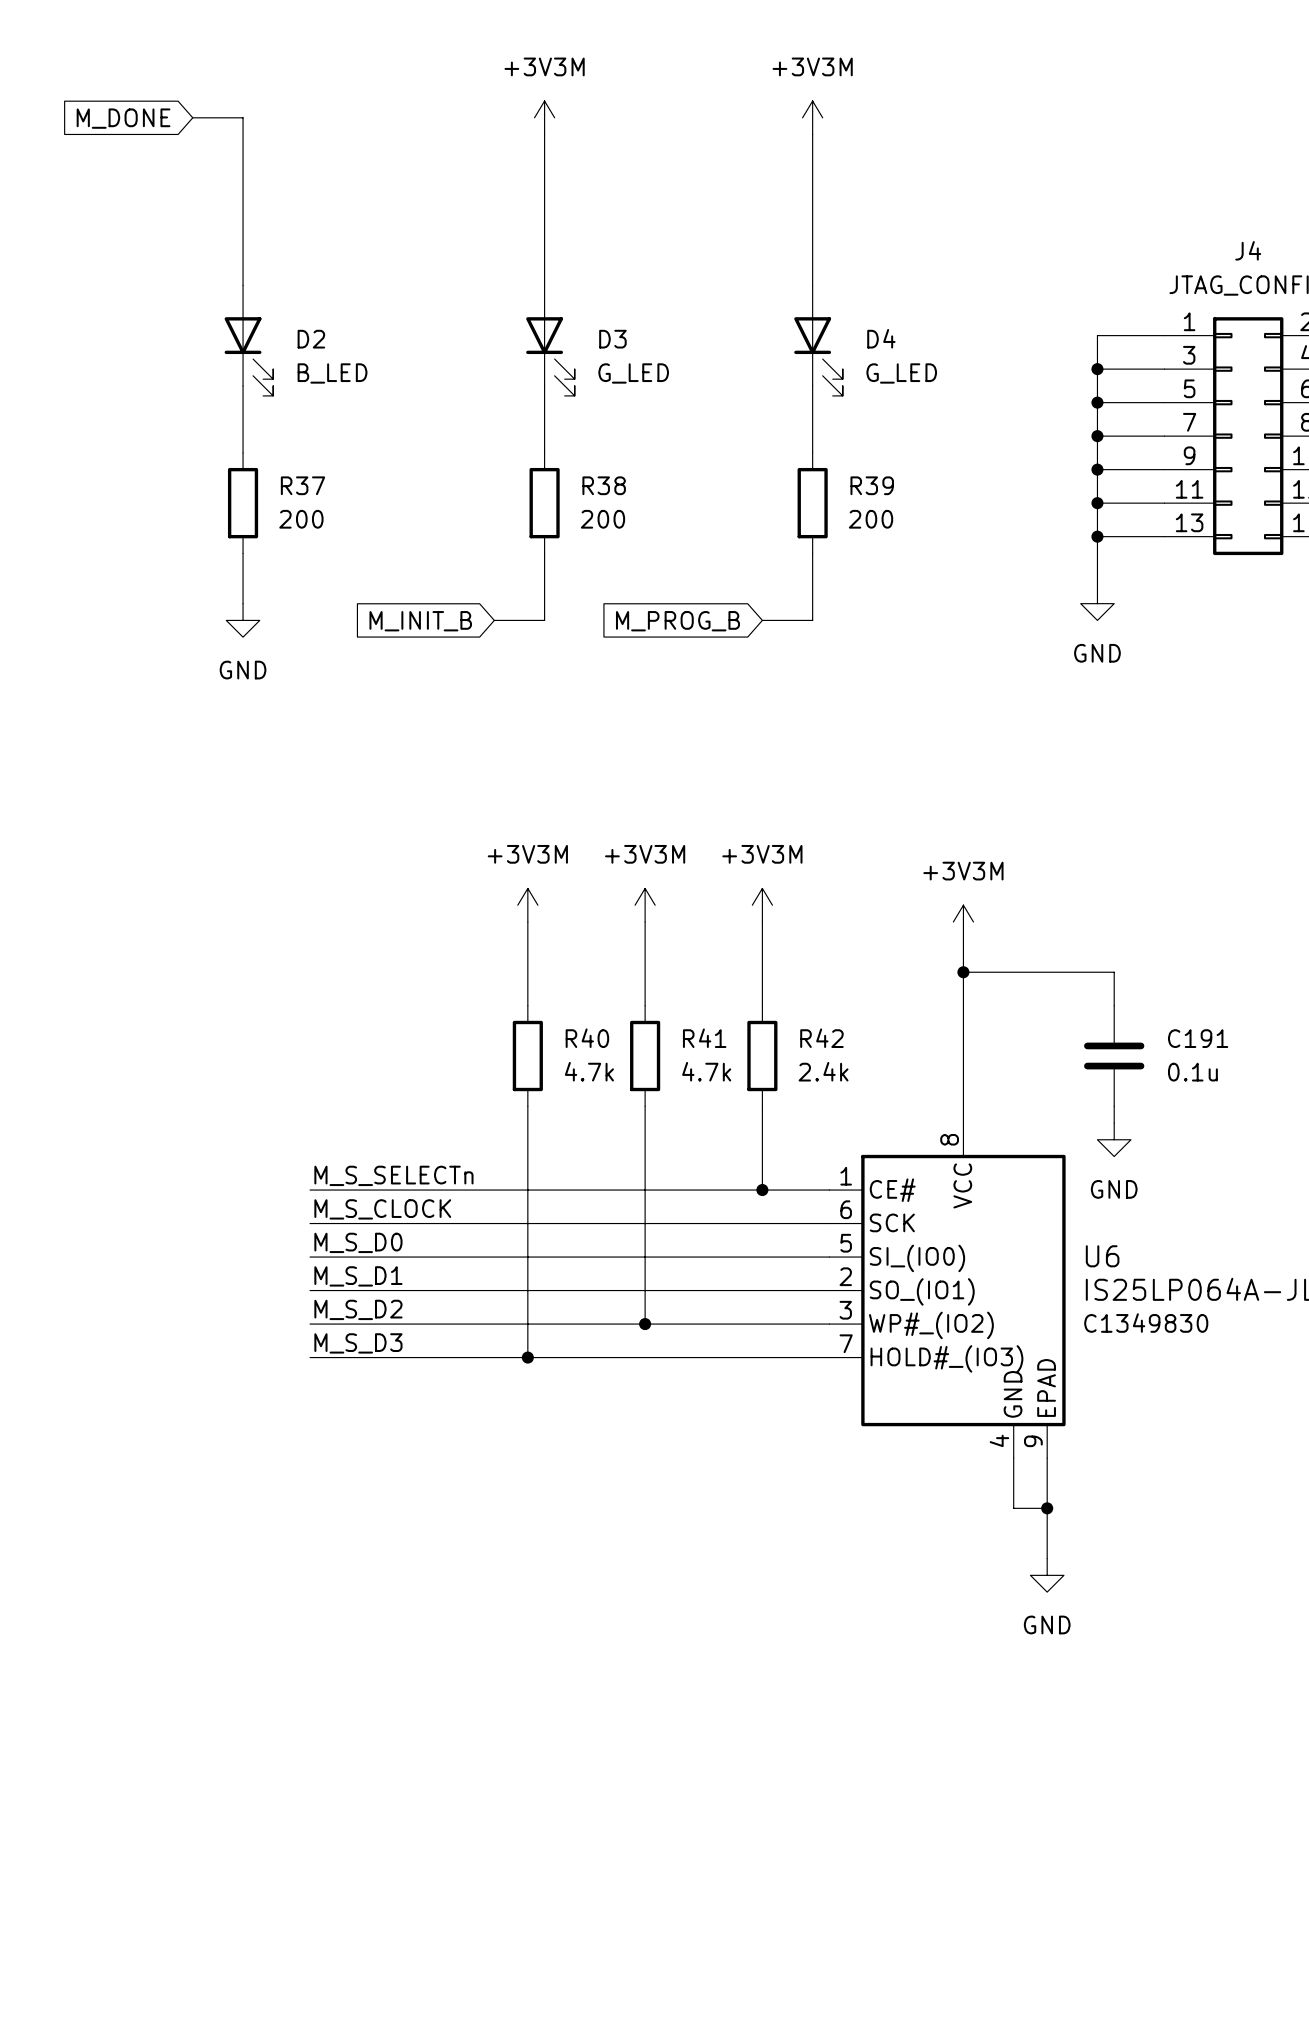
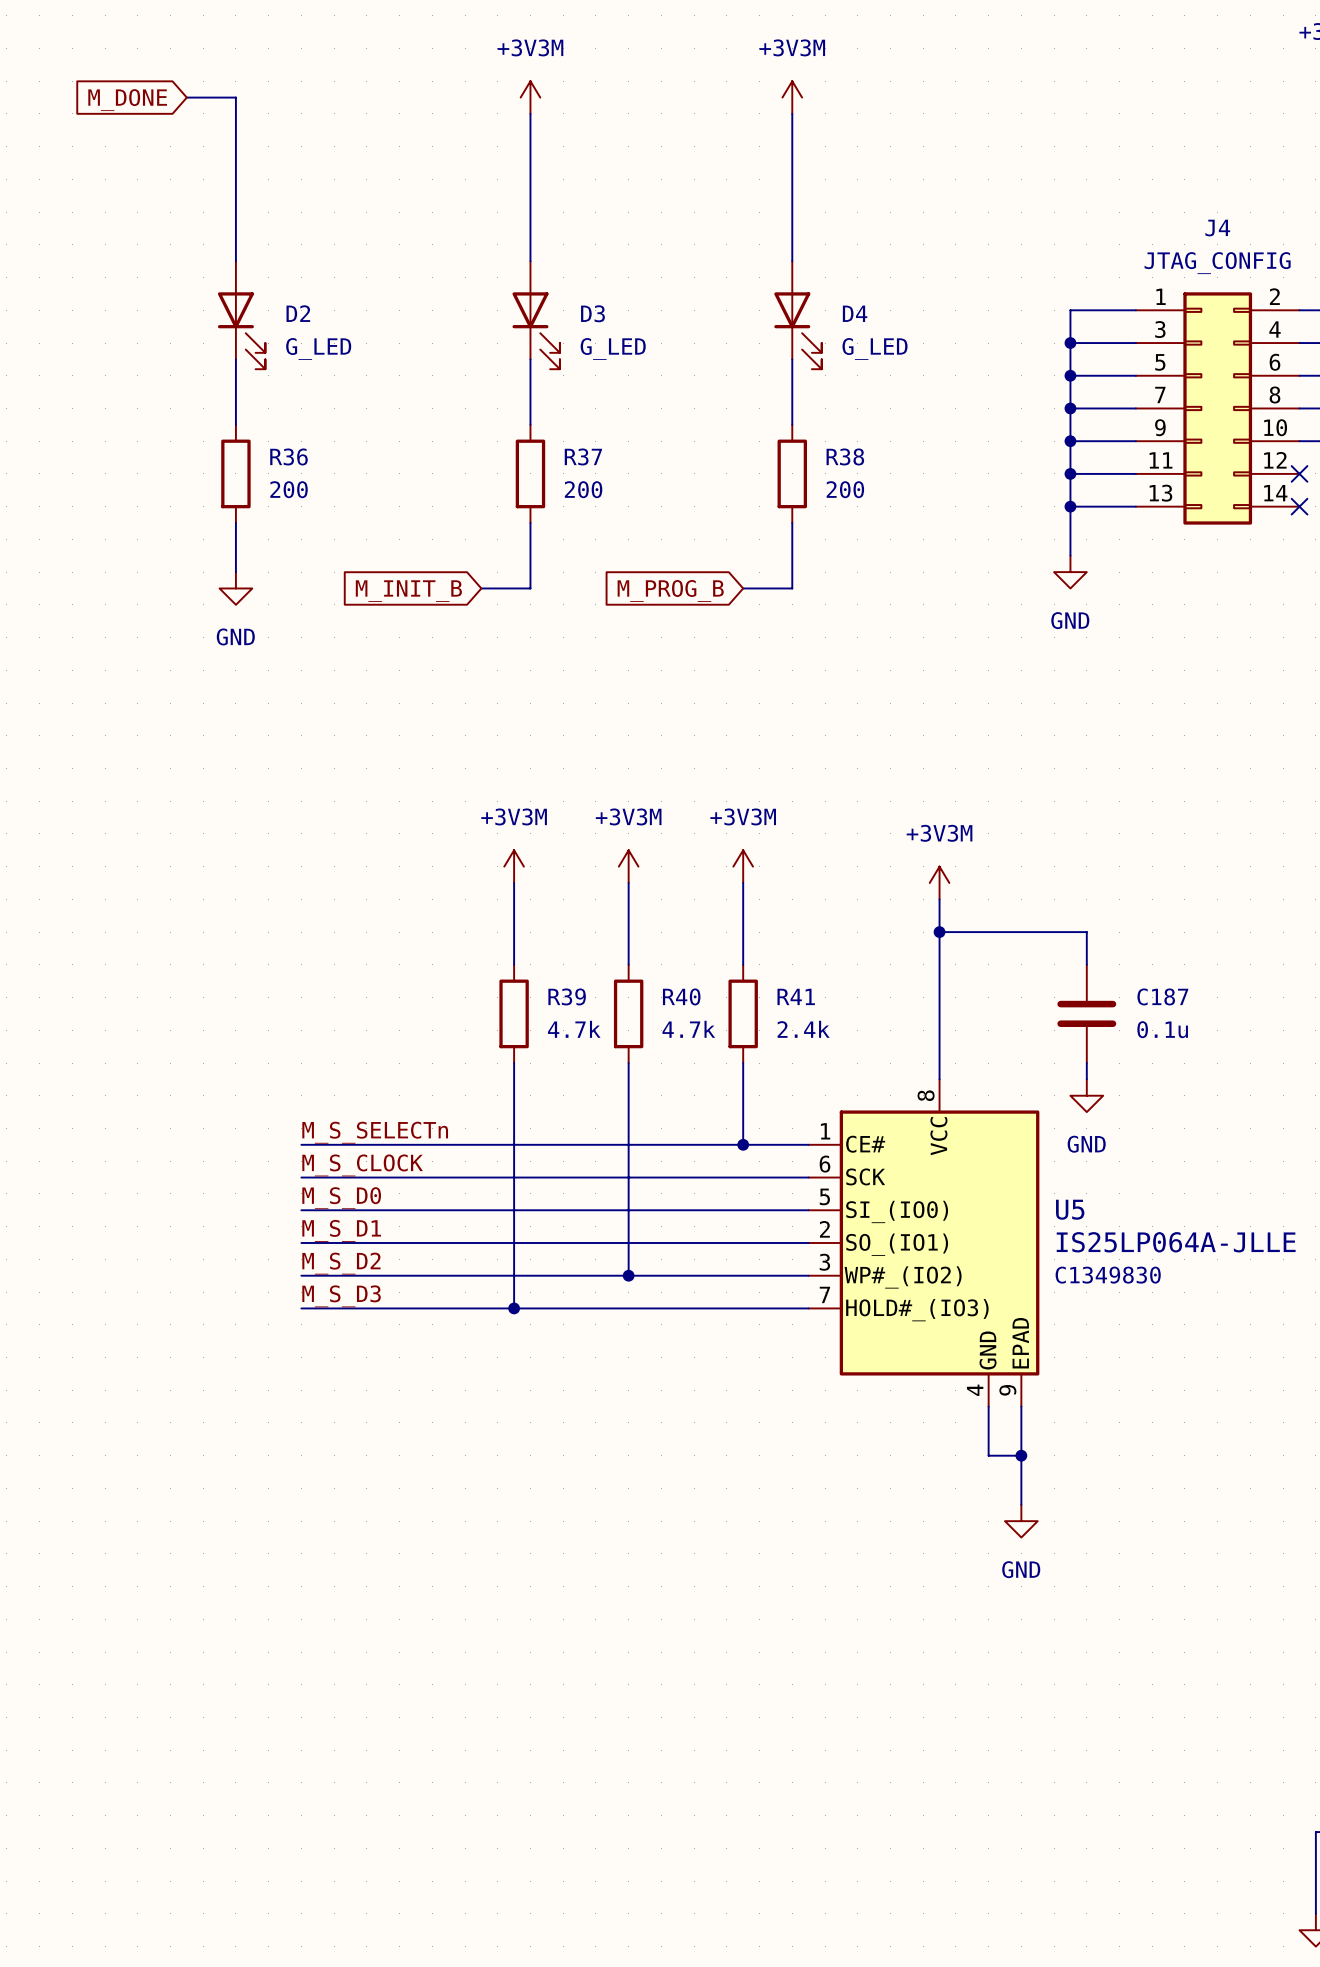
D2 value: B_LED (332, 373) -> G_LED (318, 349)
R37 name: R37 (302, 485) -> R36 (288, 456)
R38 name: R38 (604, 485) -> R37 (583, 456)
R39 name: R39 (872, 485) -> R38 (845, 456)
R40 name: R40 (587, 1038) -> R39 (567, 996)
R41 name: R41 (704, 1038) -> R40 (681, 996)
R42 name: R42 (821, 1038) -> R41 (796, 996)
C191 name: C191 (1198, 1038) -> C187 (1162, 996)
U6 name: U6 (1102, 1256) -> U5 (1070, 1209)

